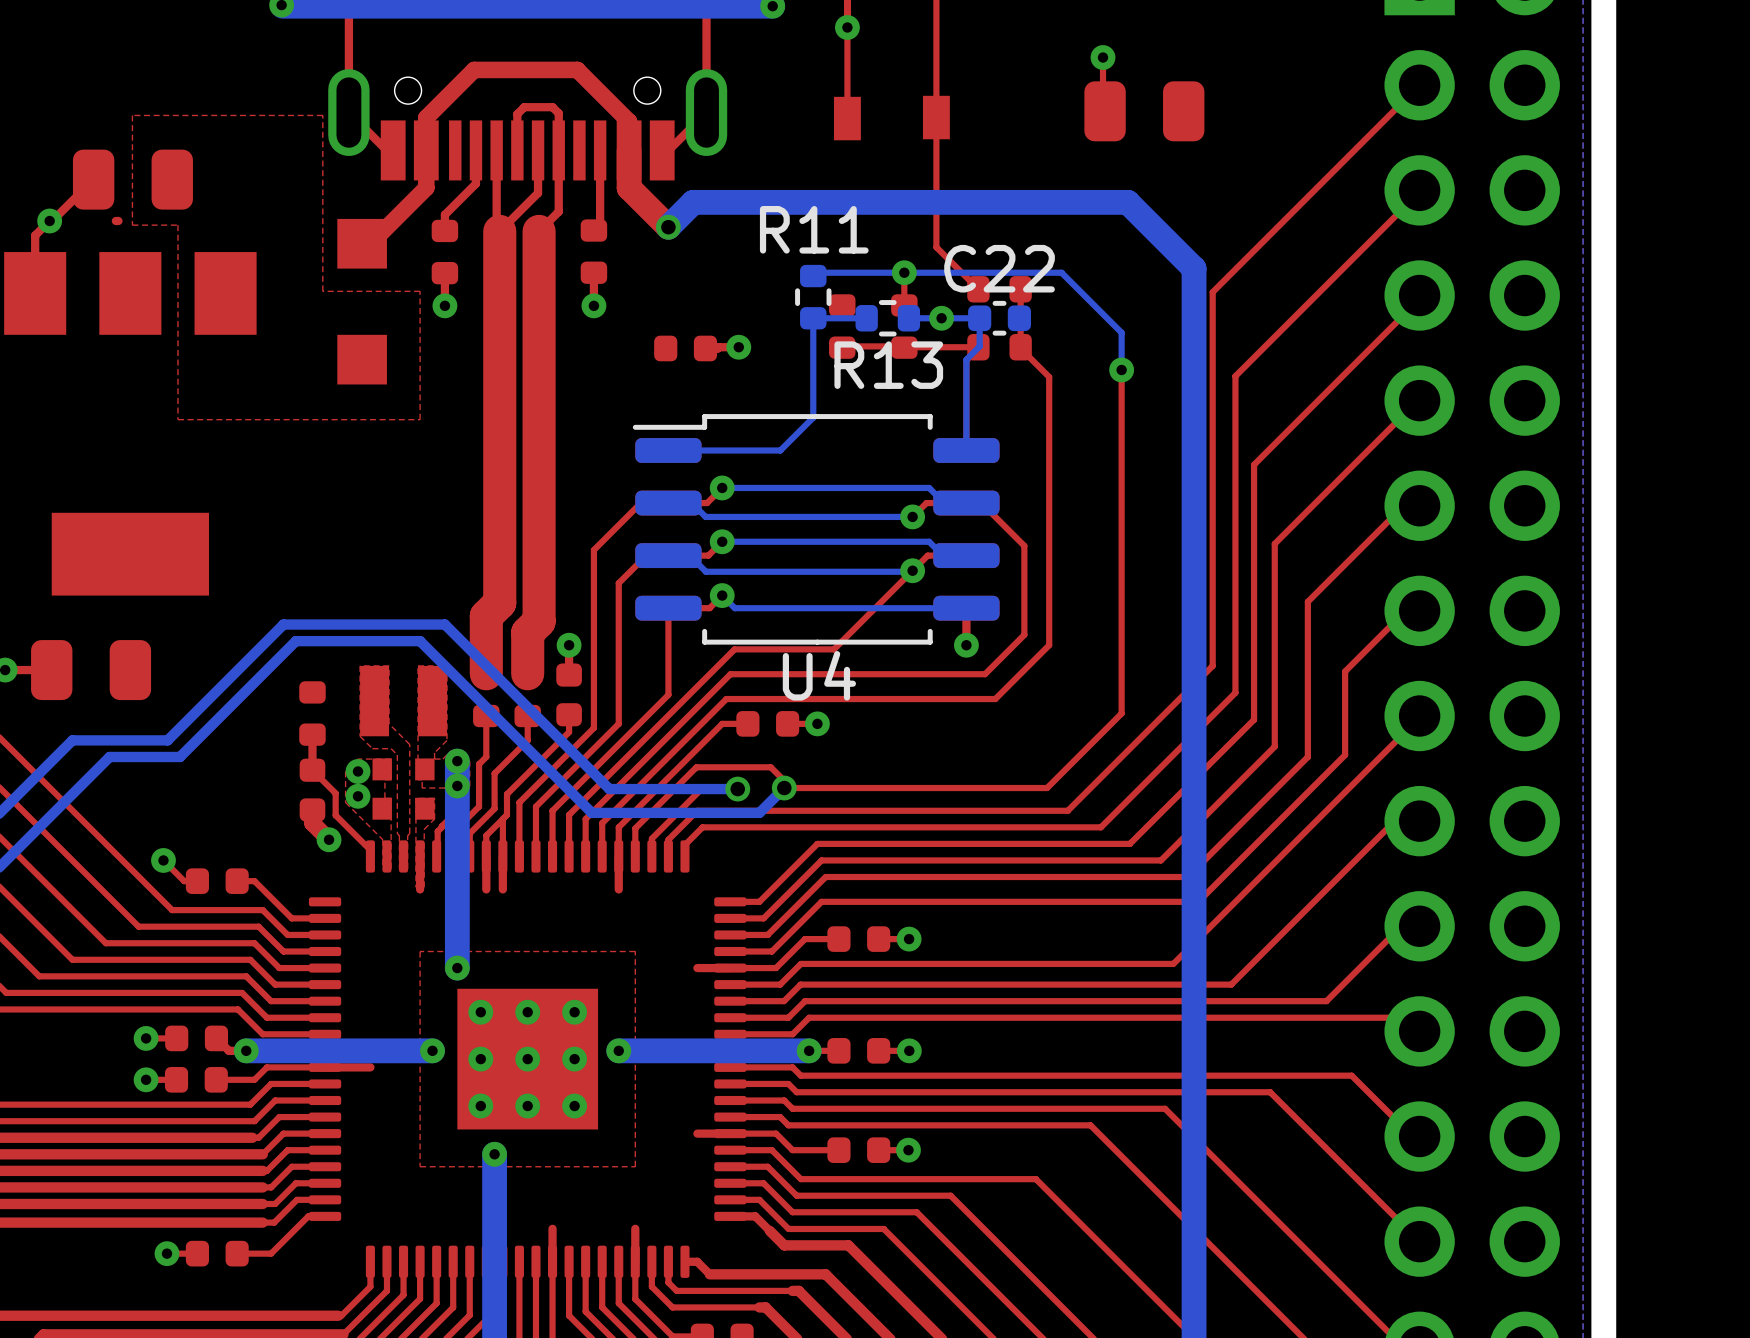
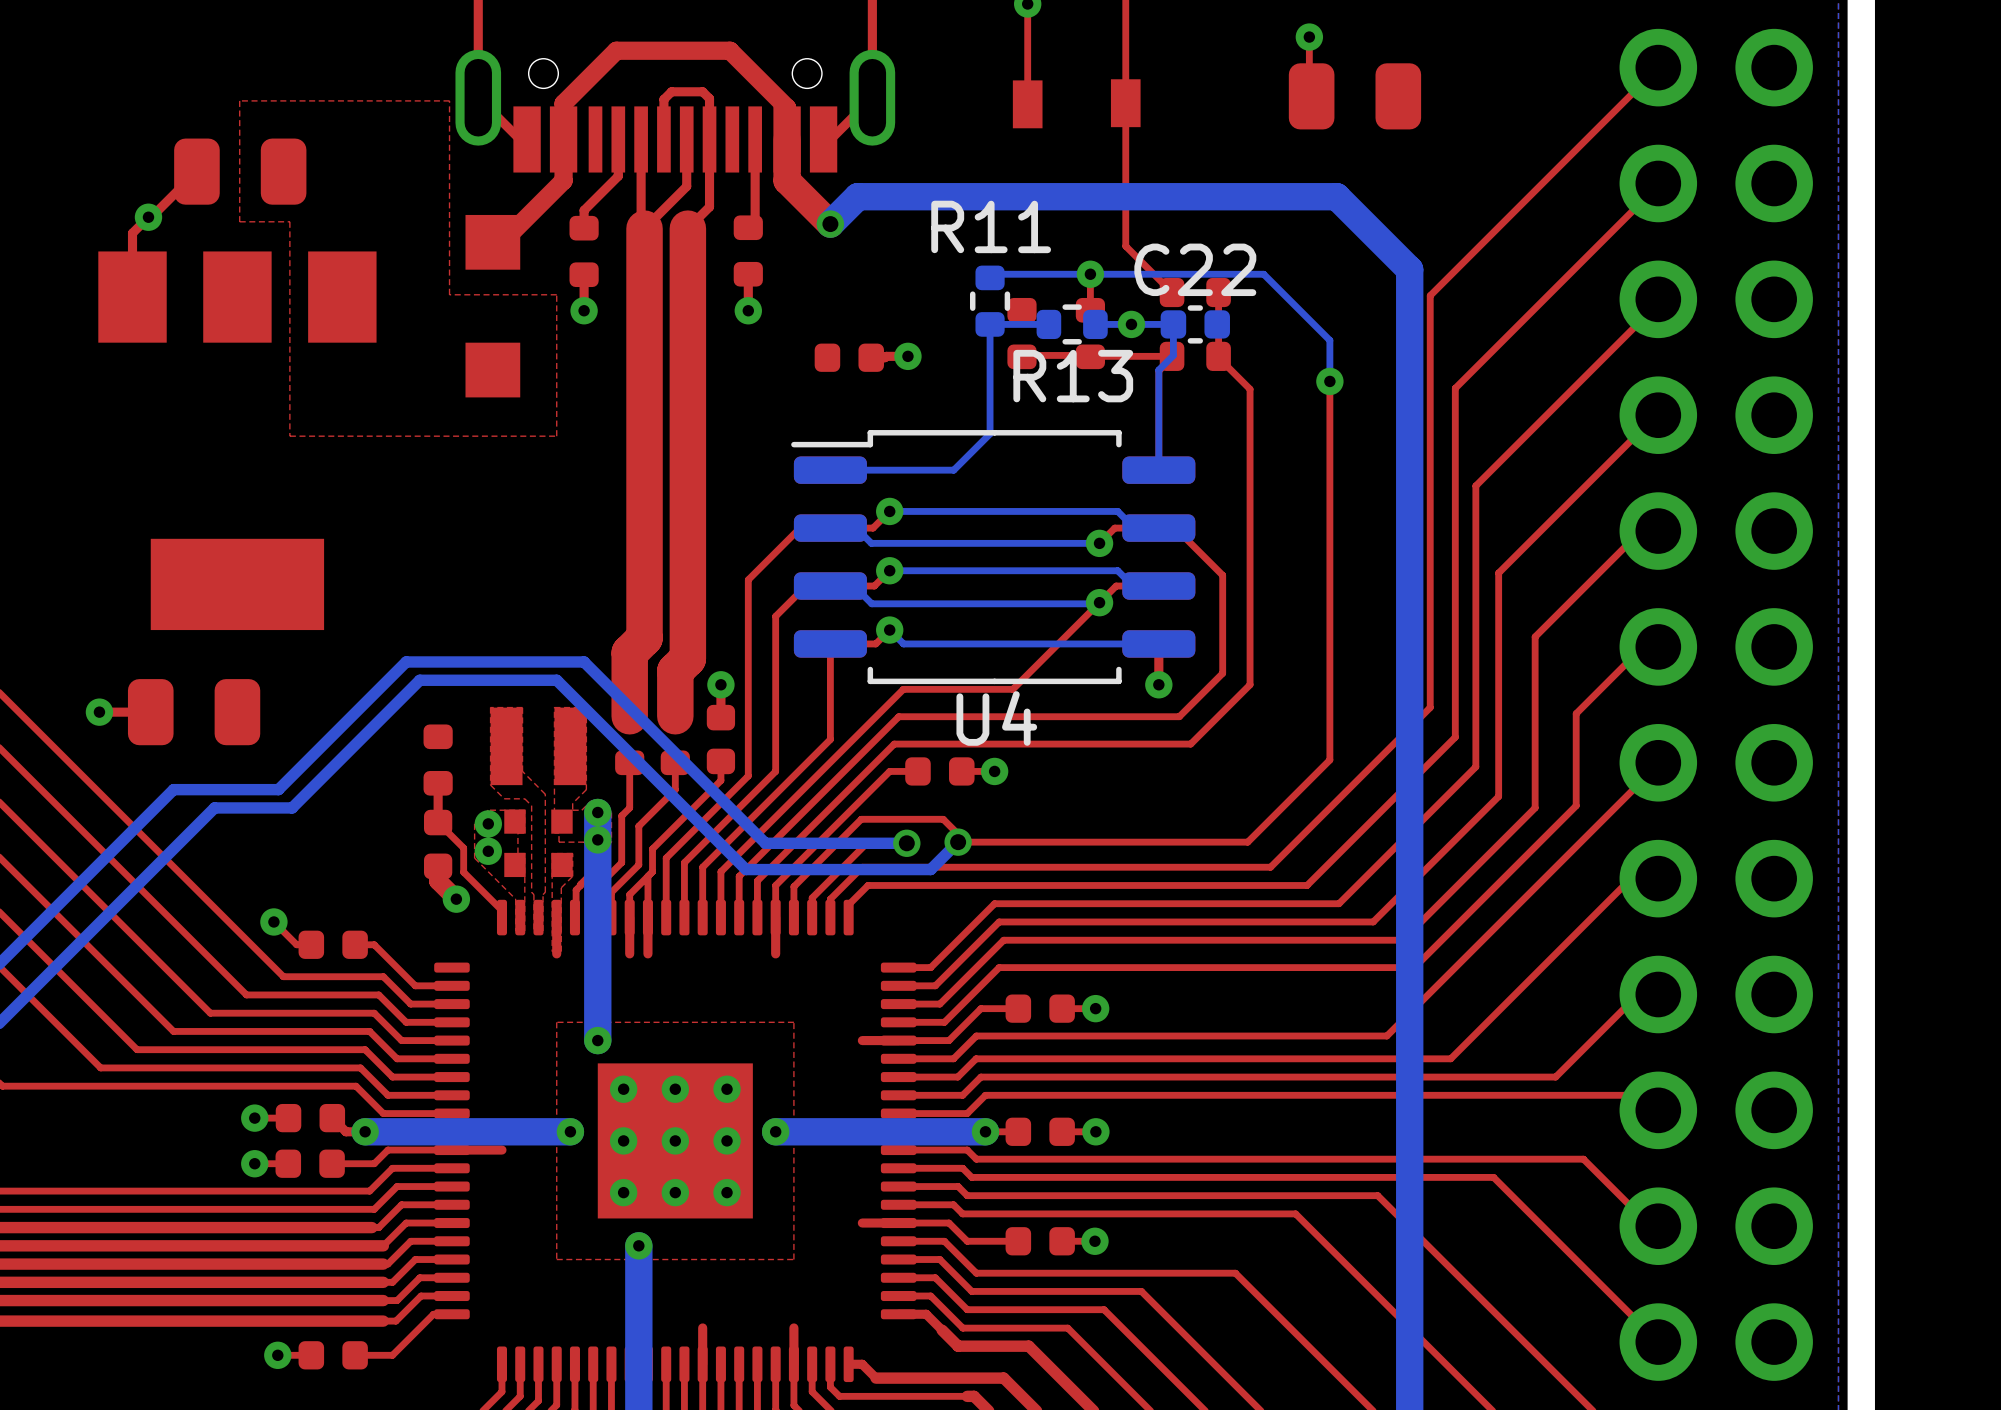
top track: (118, 221) (115, 221) -> none

